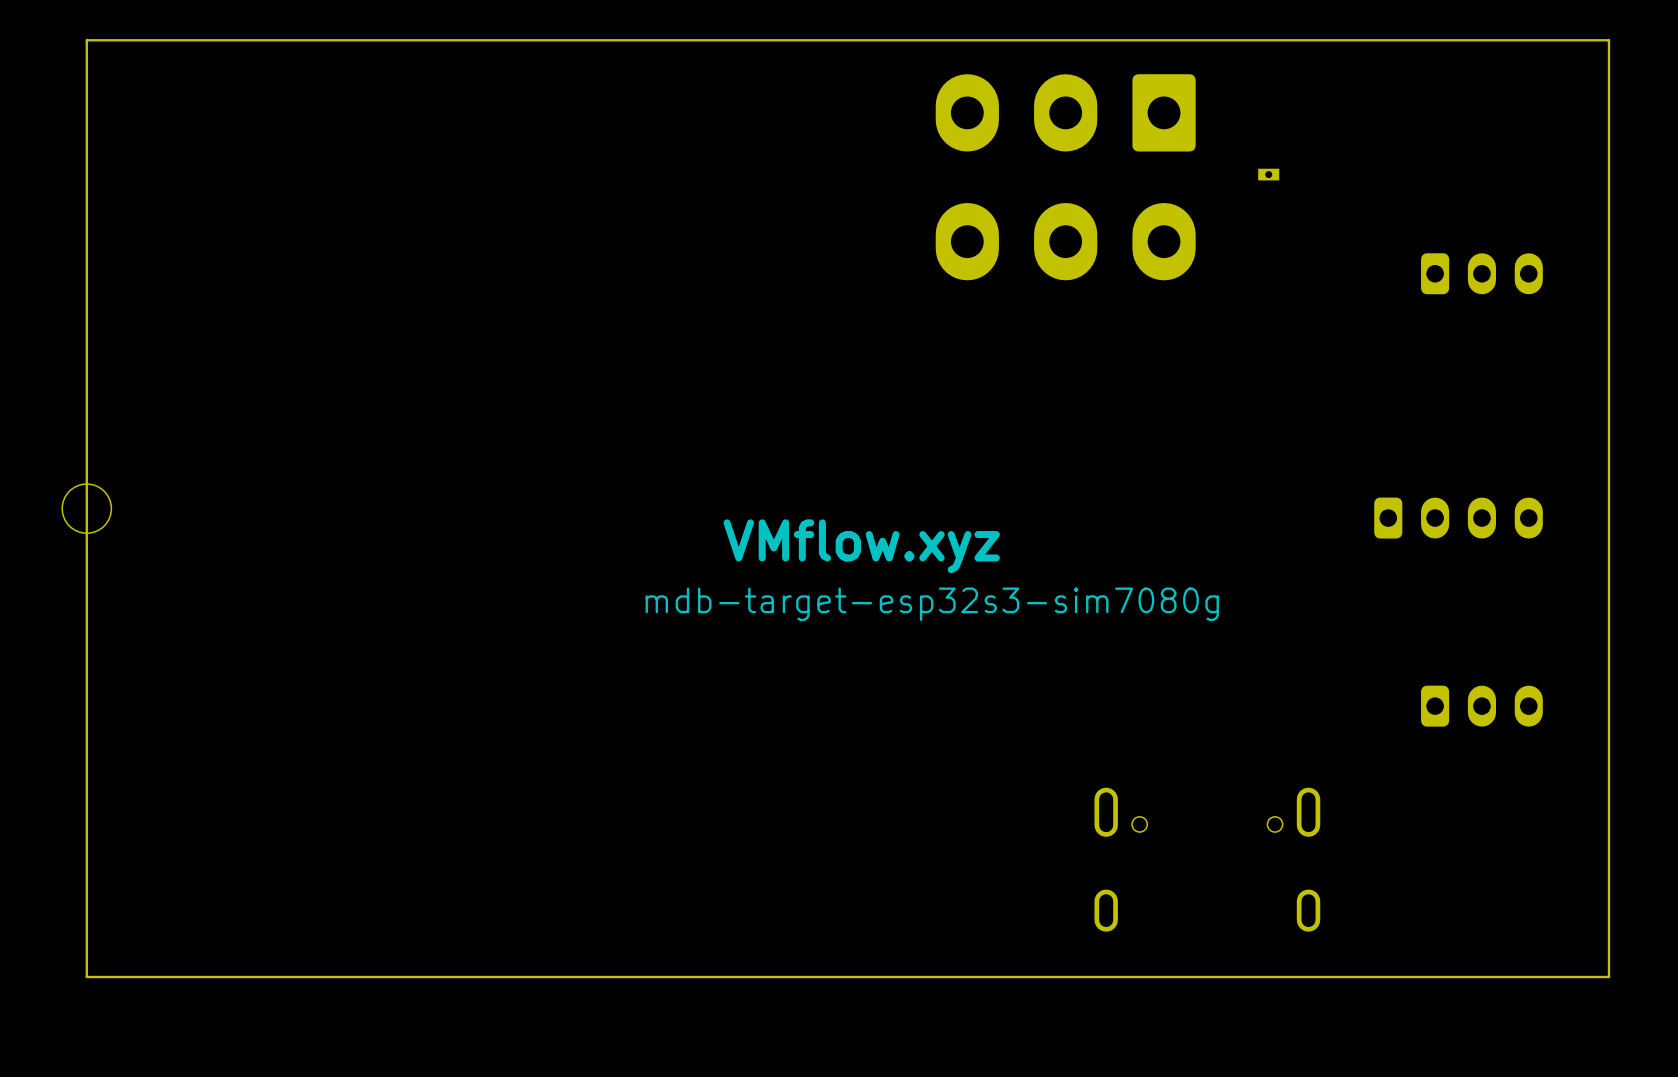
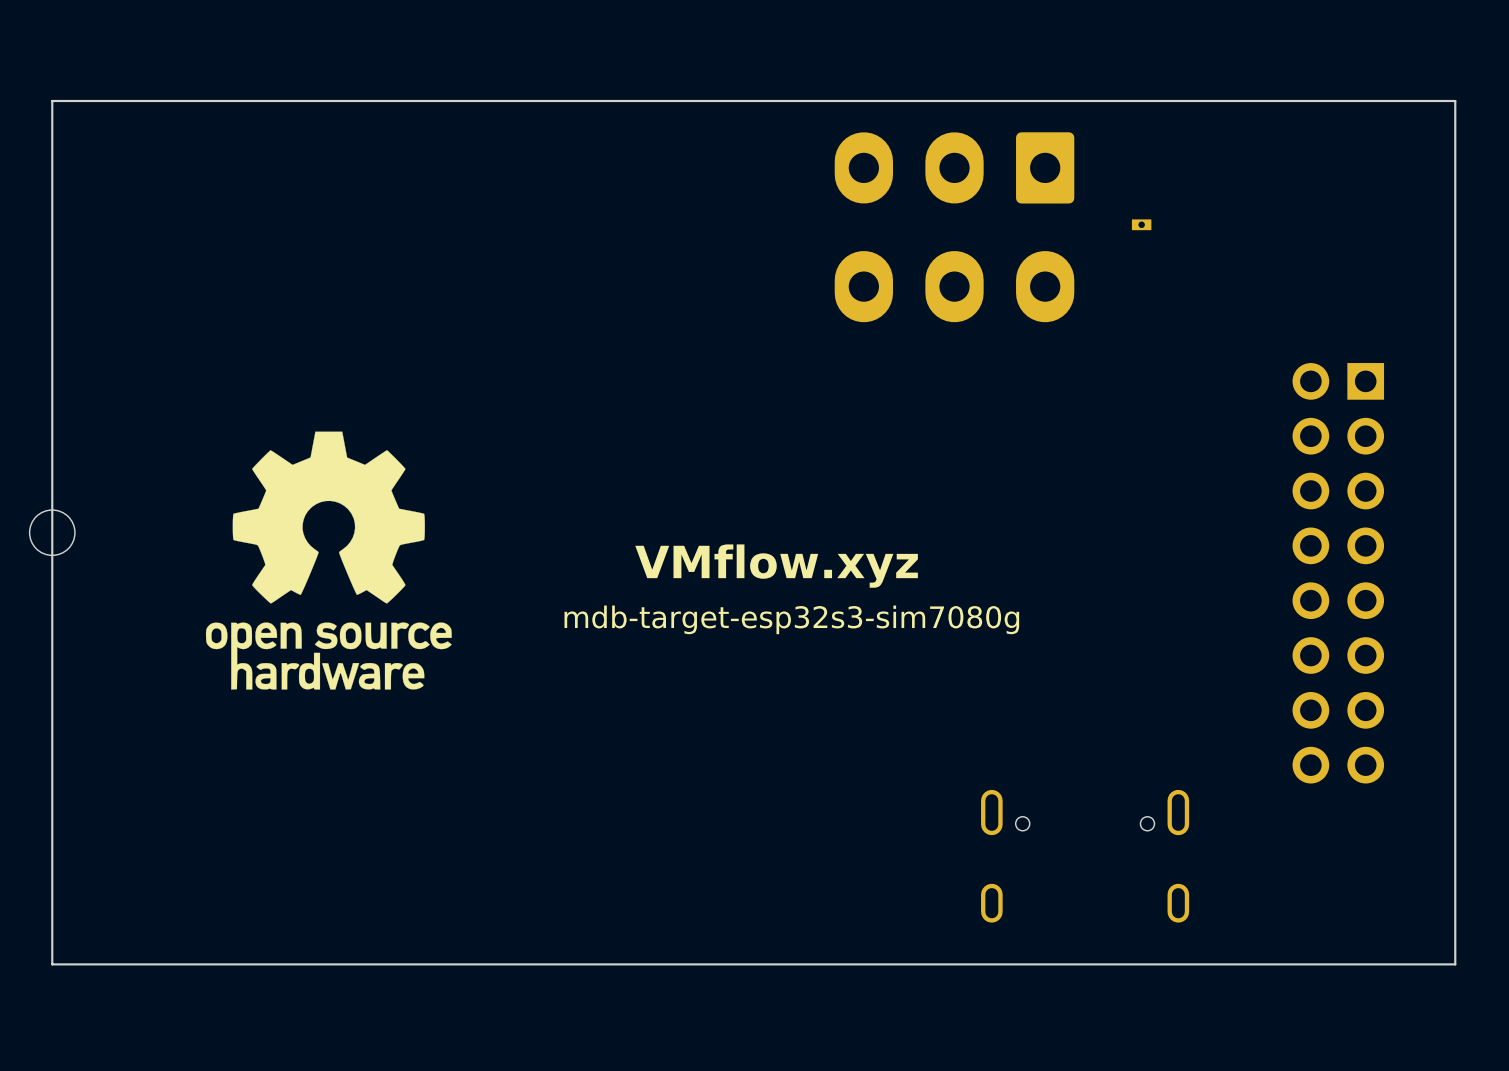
part: (1481, 273) -> none
drawing: none -> [205, 431, 452, 690]
part: (1458, 518) -> none
part: none -> (1338, 573)
part: (1481, 706) -> none

